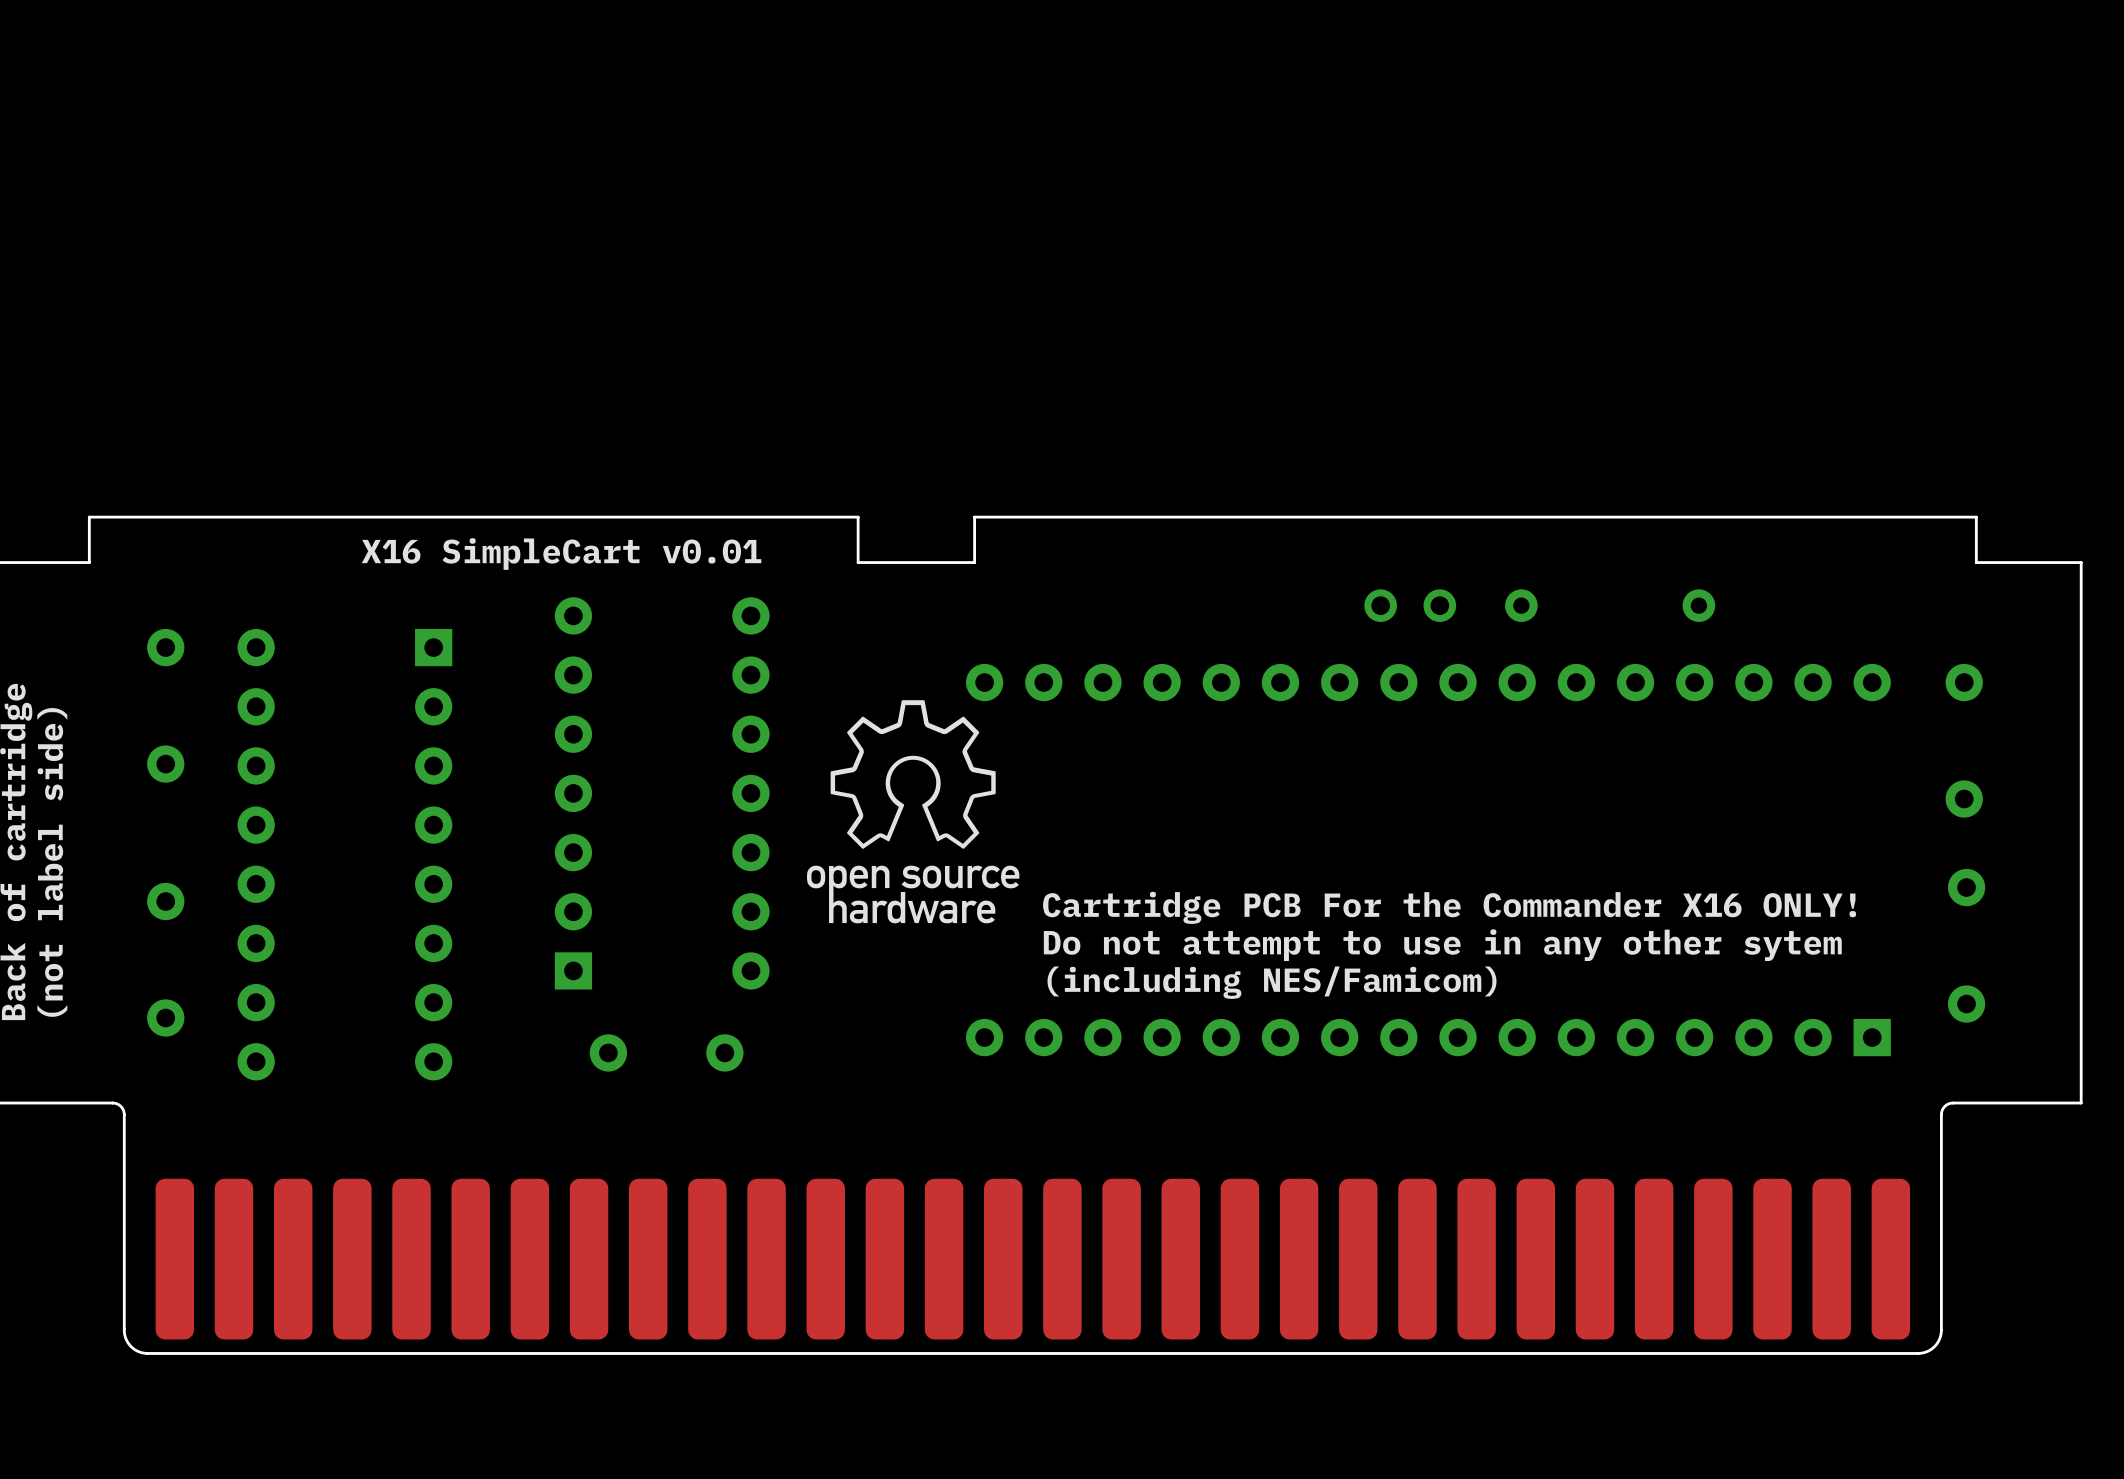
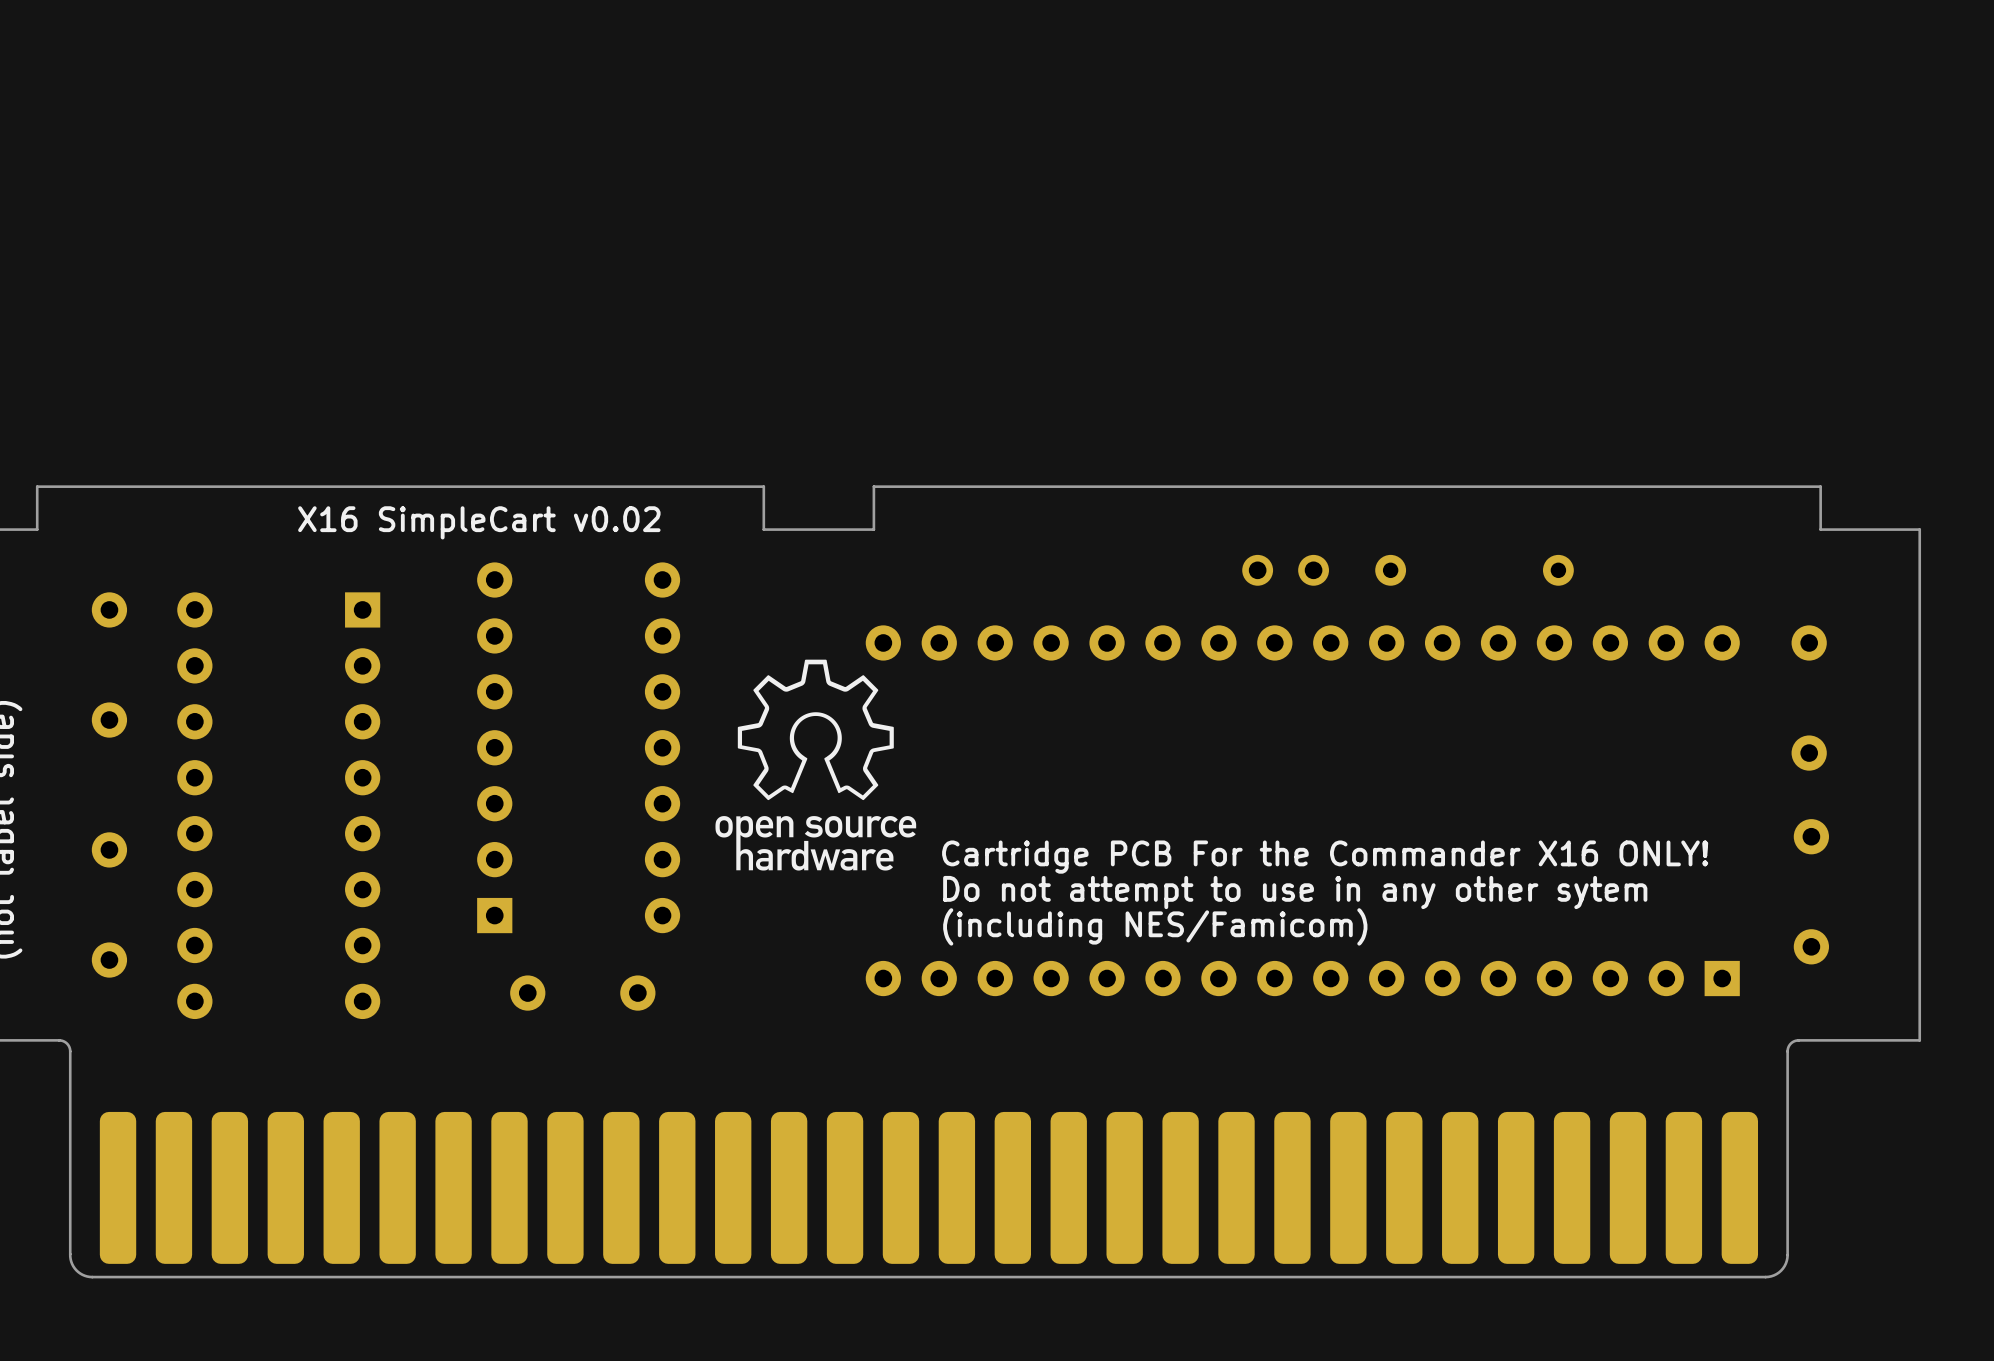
text: X16 SimpleCart v0.01 (561, 554) -> X16 SimpleCart v0.02 (479, 522)

